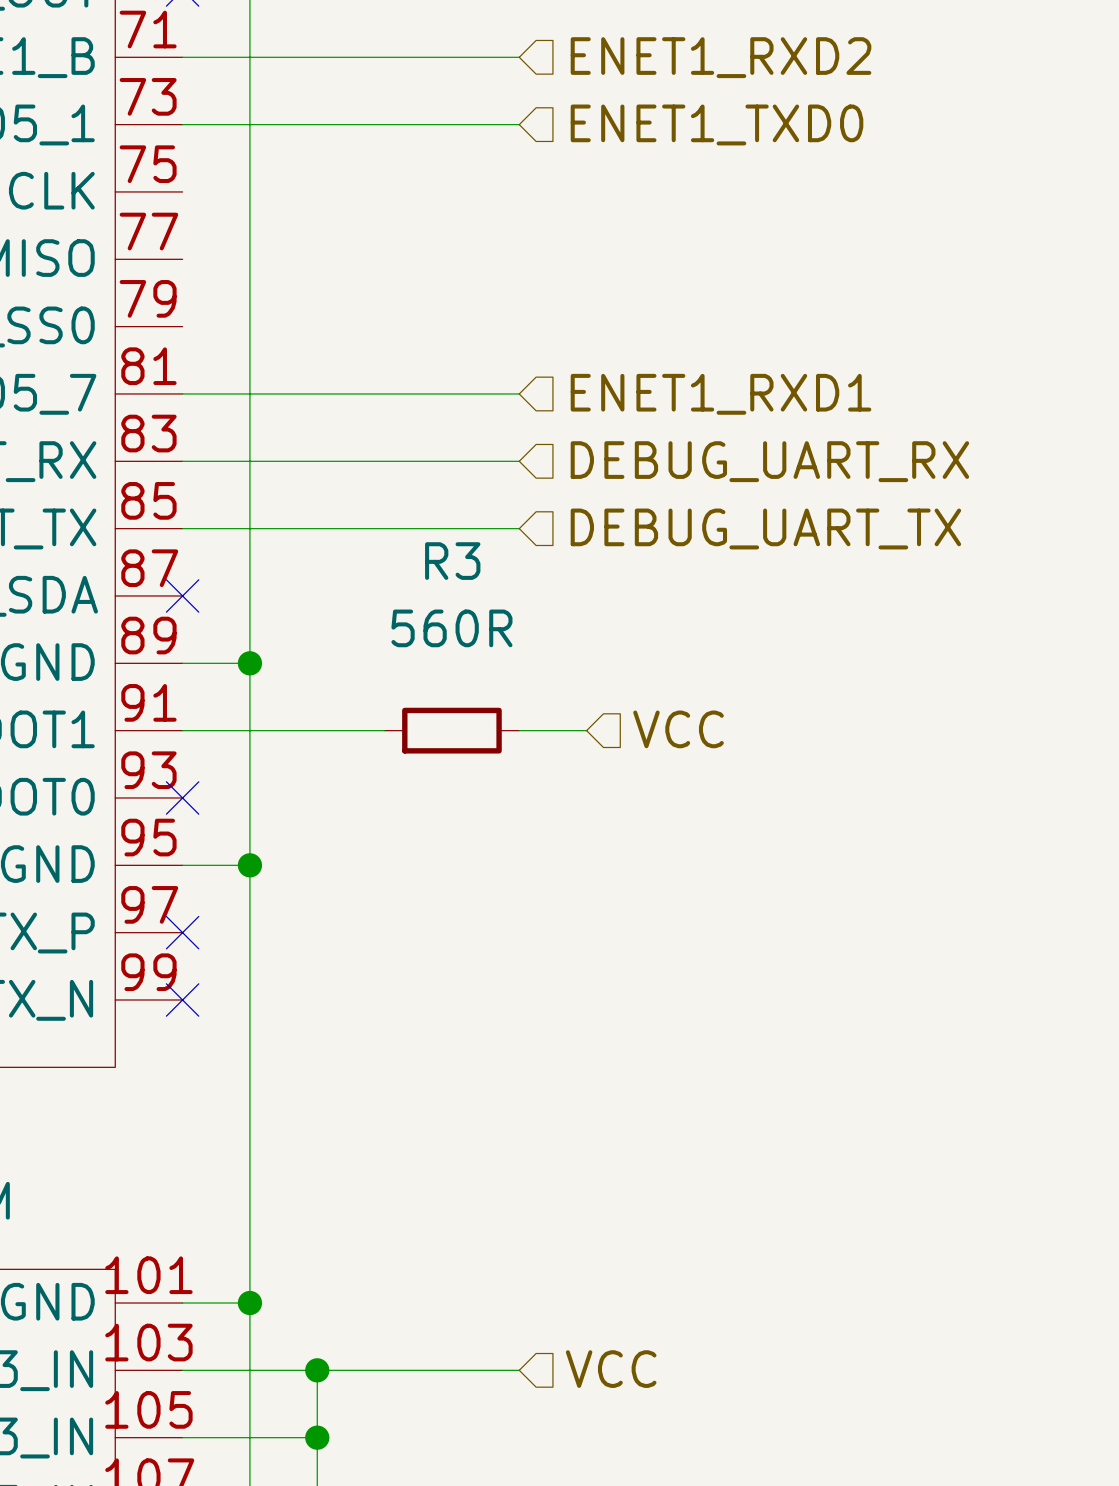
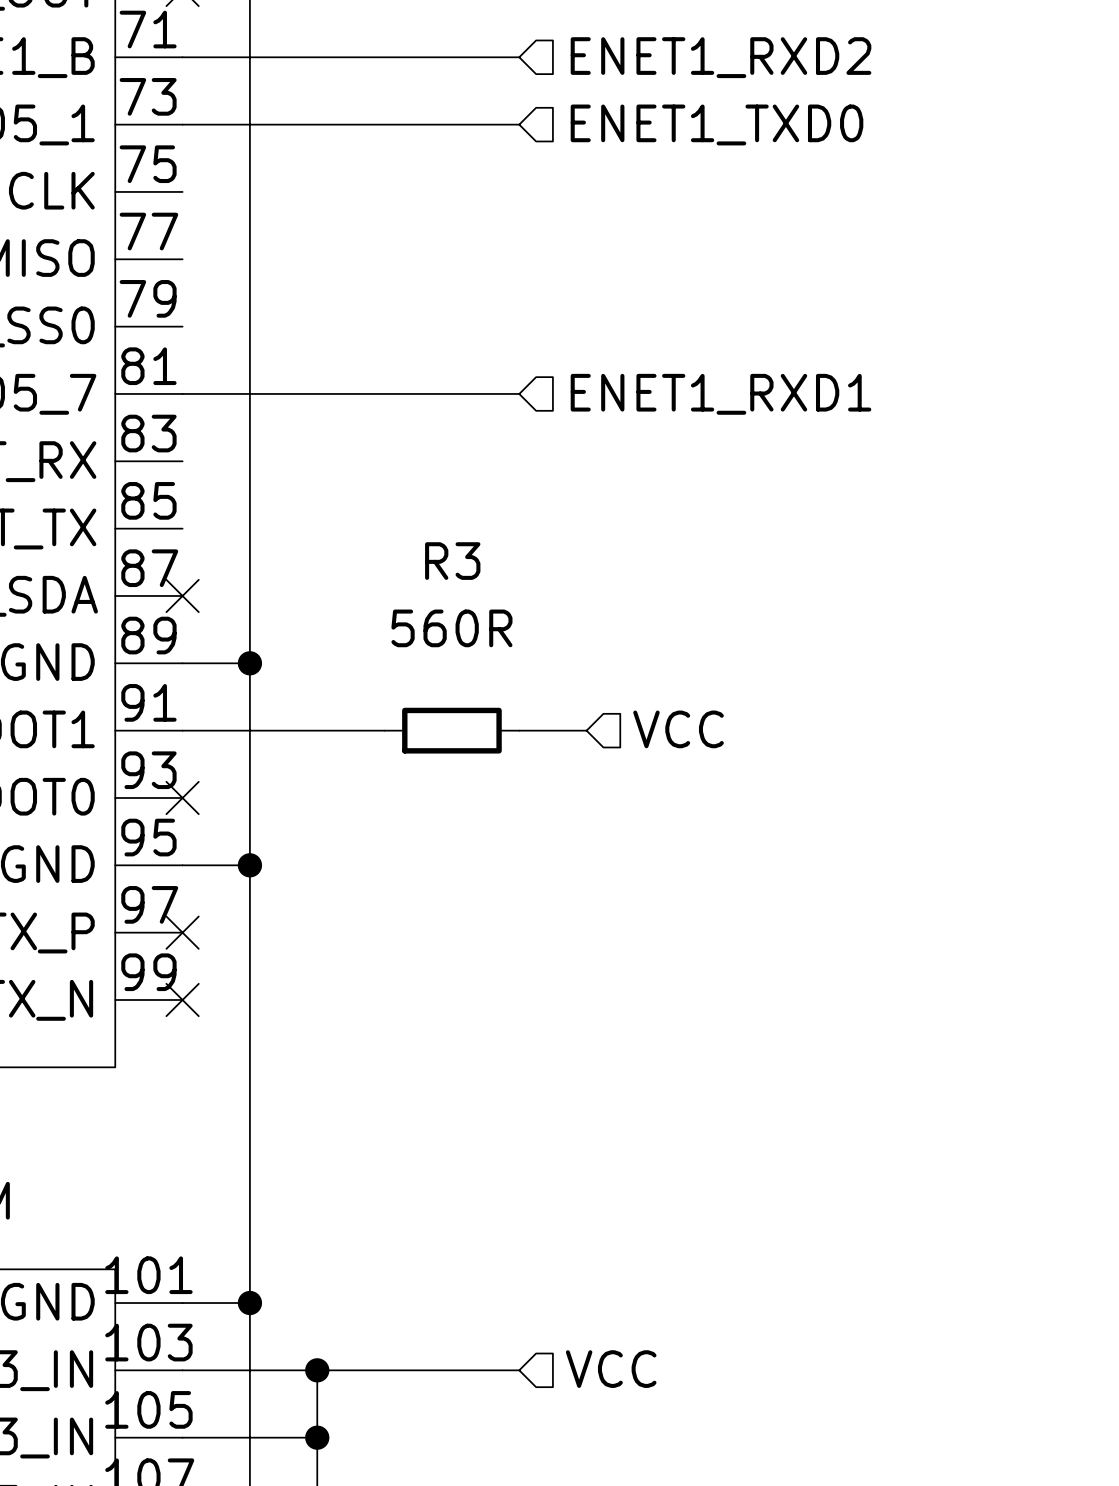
wire: (182, 461) (519, 461) -> none
hierarchical label: DEBUG_UART_RX (769, 461) -> none
wire: (182, 528) (519, 528) -> none
hierarchical label: DEBUG_UART_TX (765, 528) -> none

